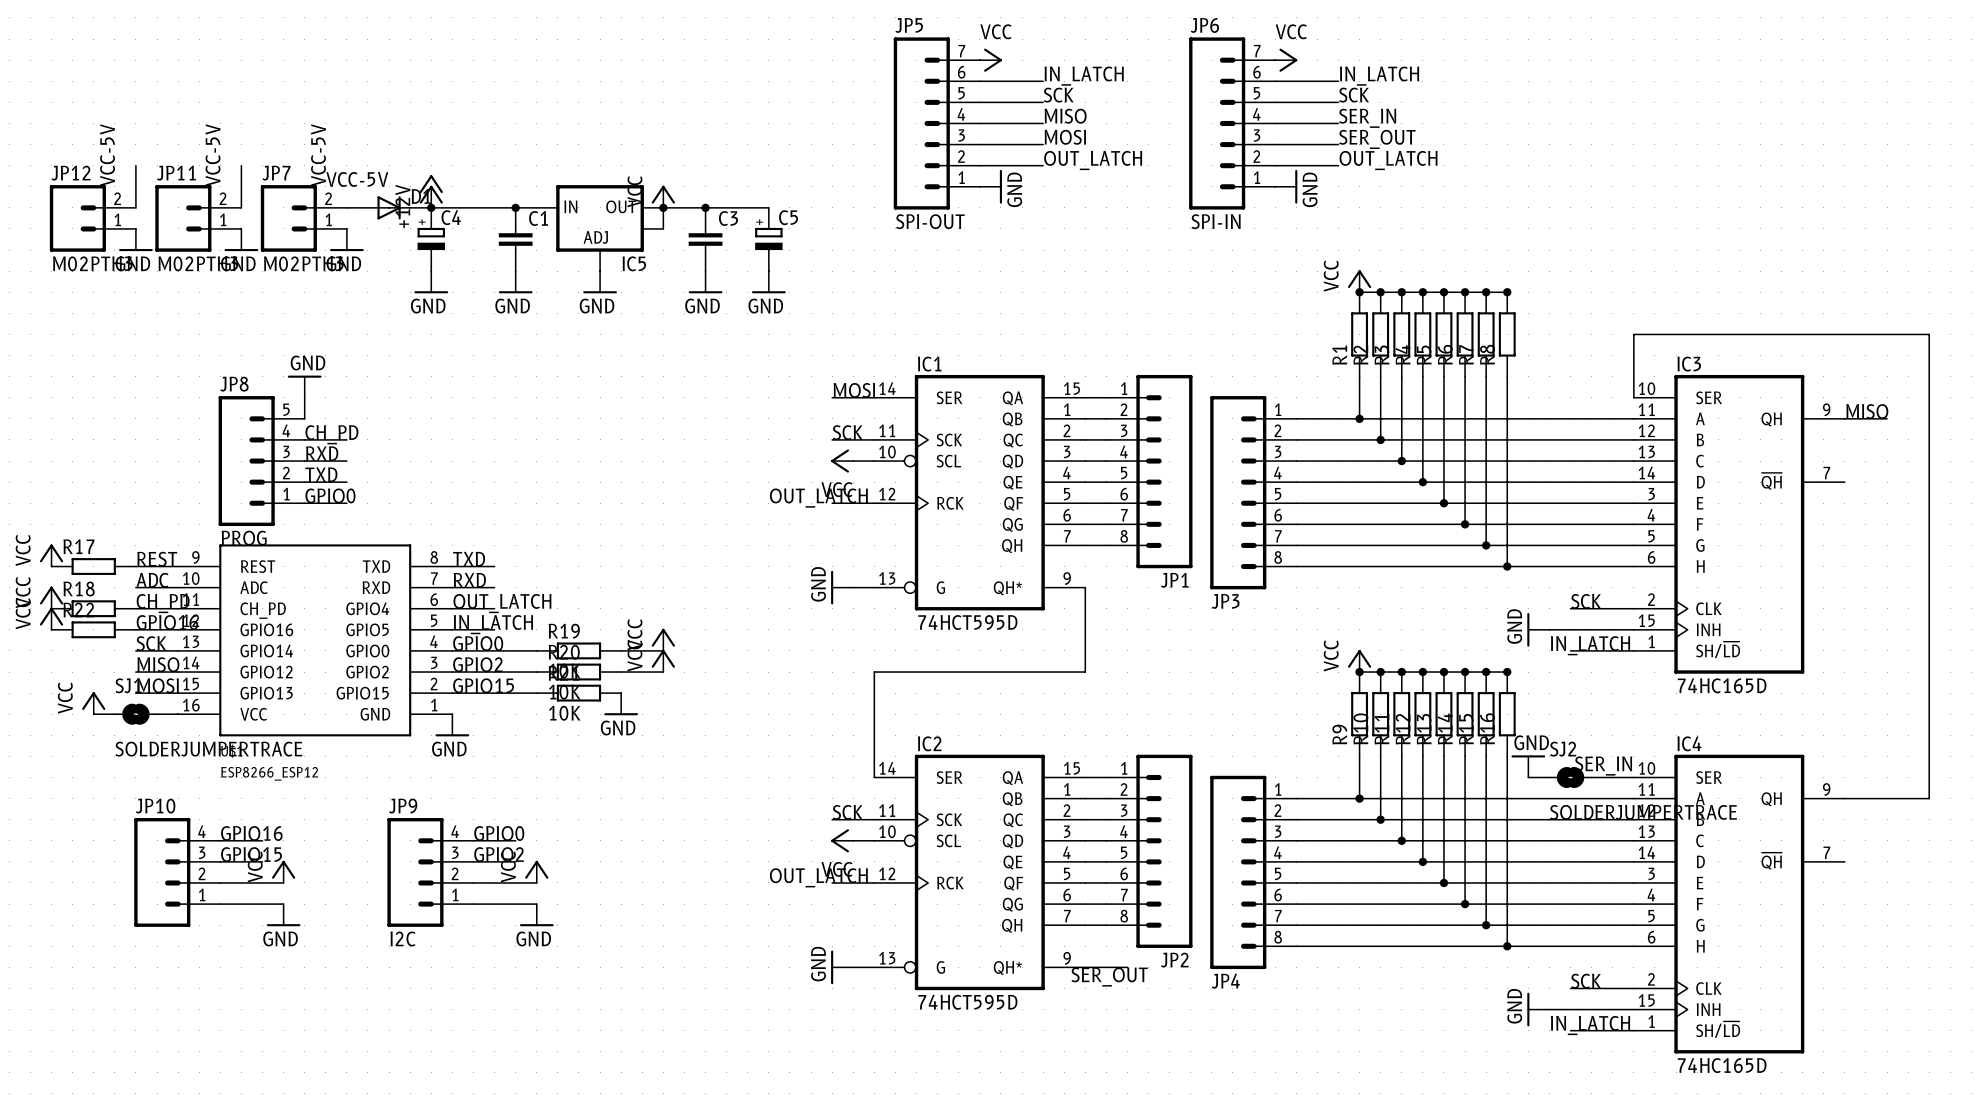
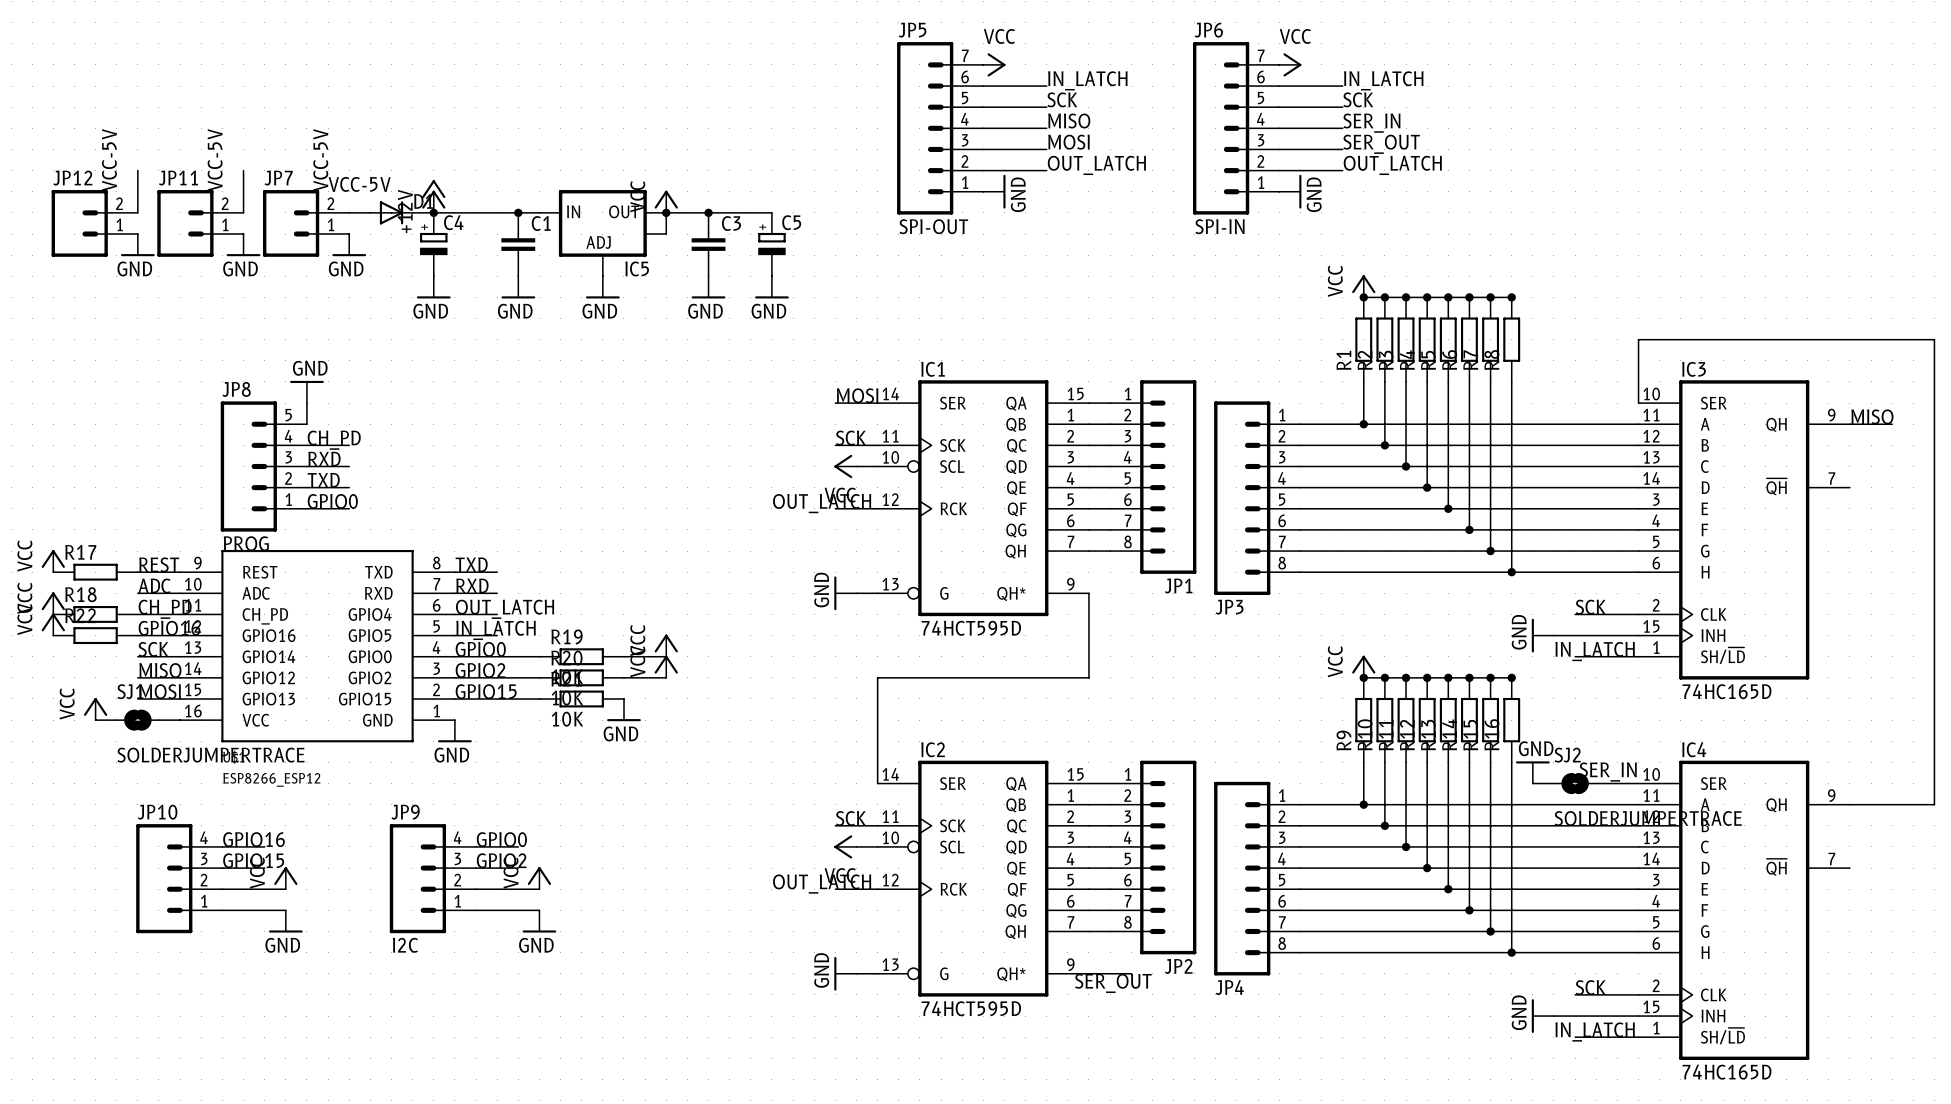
JP12 value: M02PTH3 (92, 263) -> none
JP11 value: M02PTH3 (198, 263) -> none
JP7 value: M02PTH3 (303, 263) -> none

